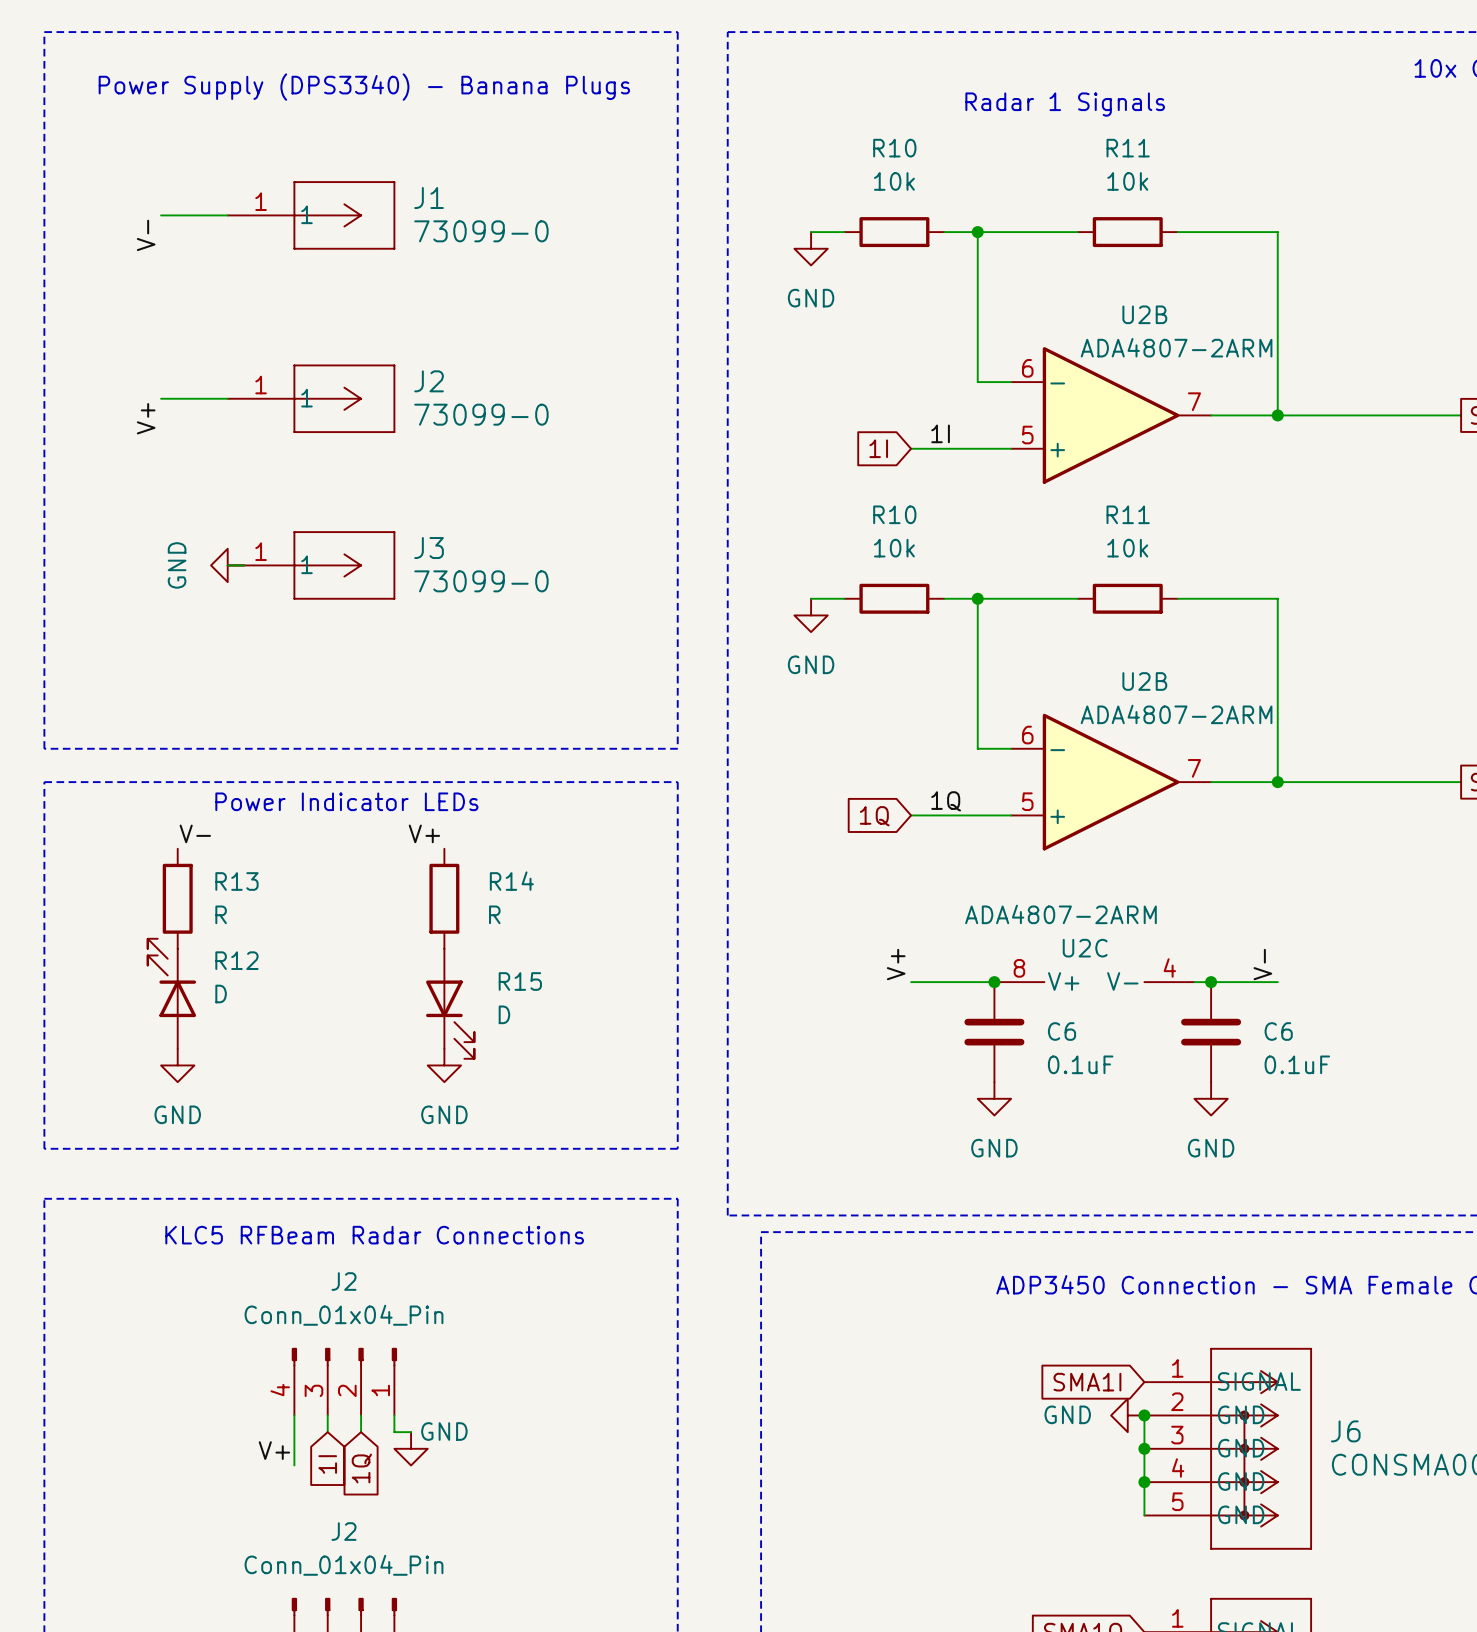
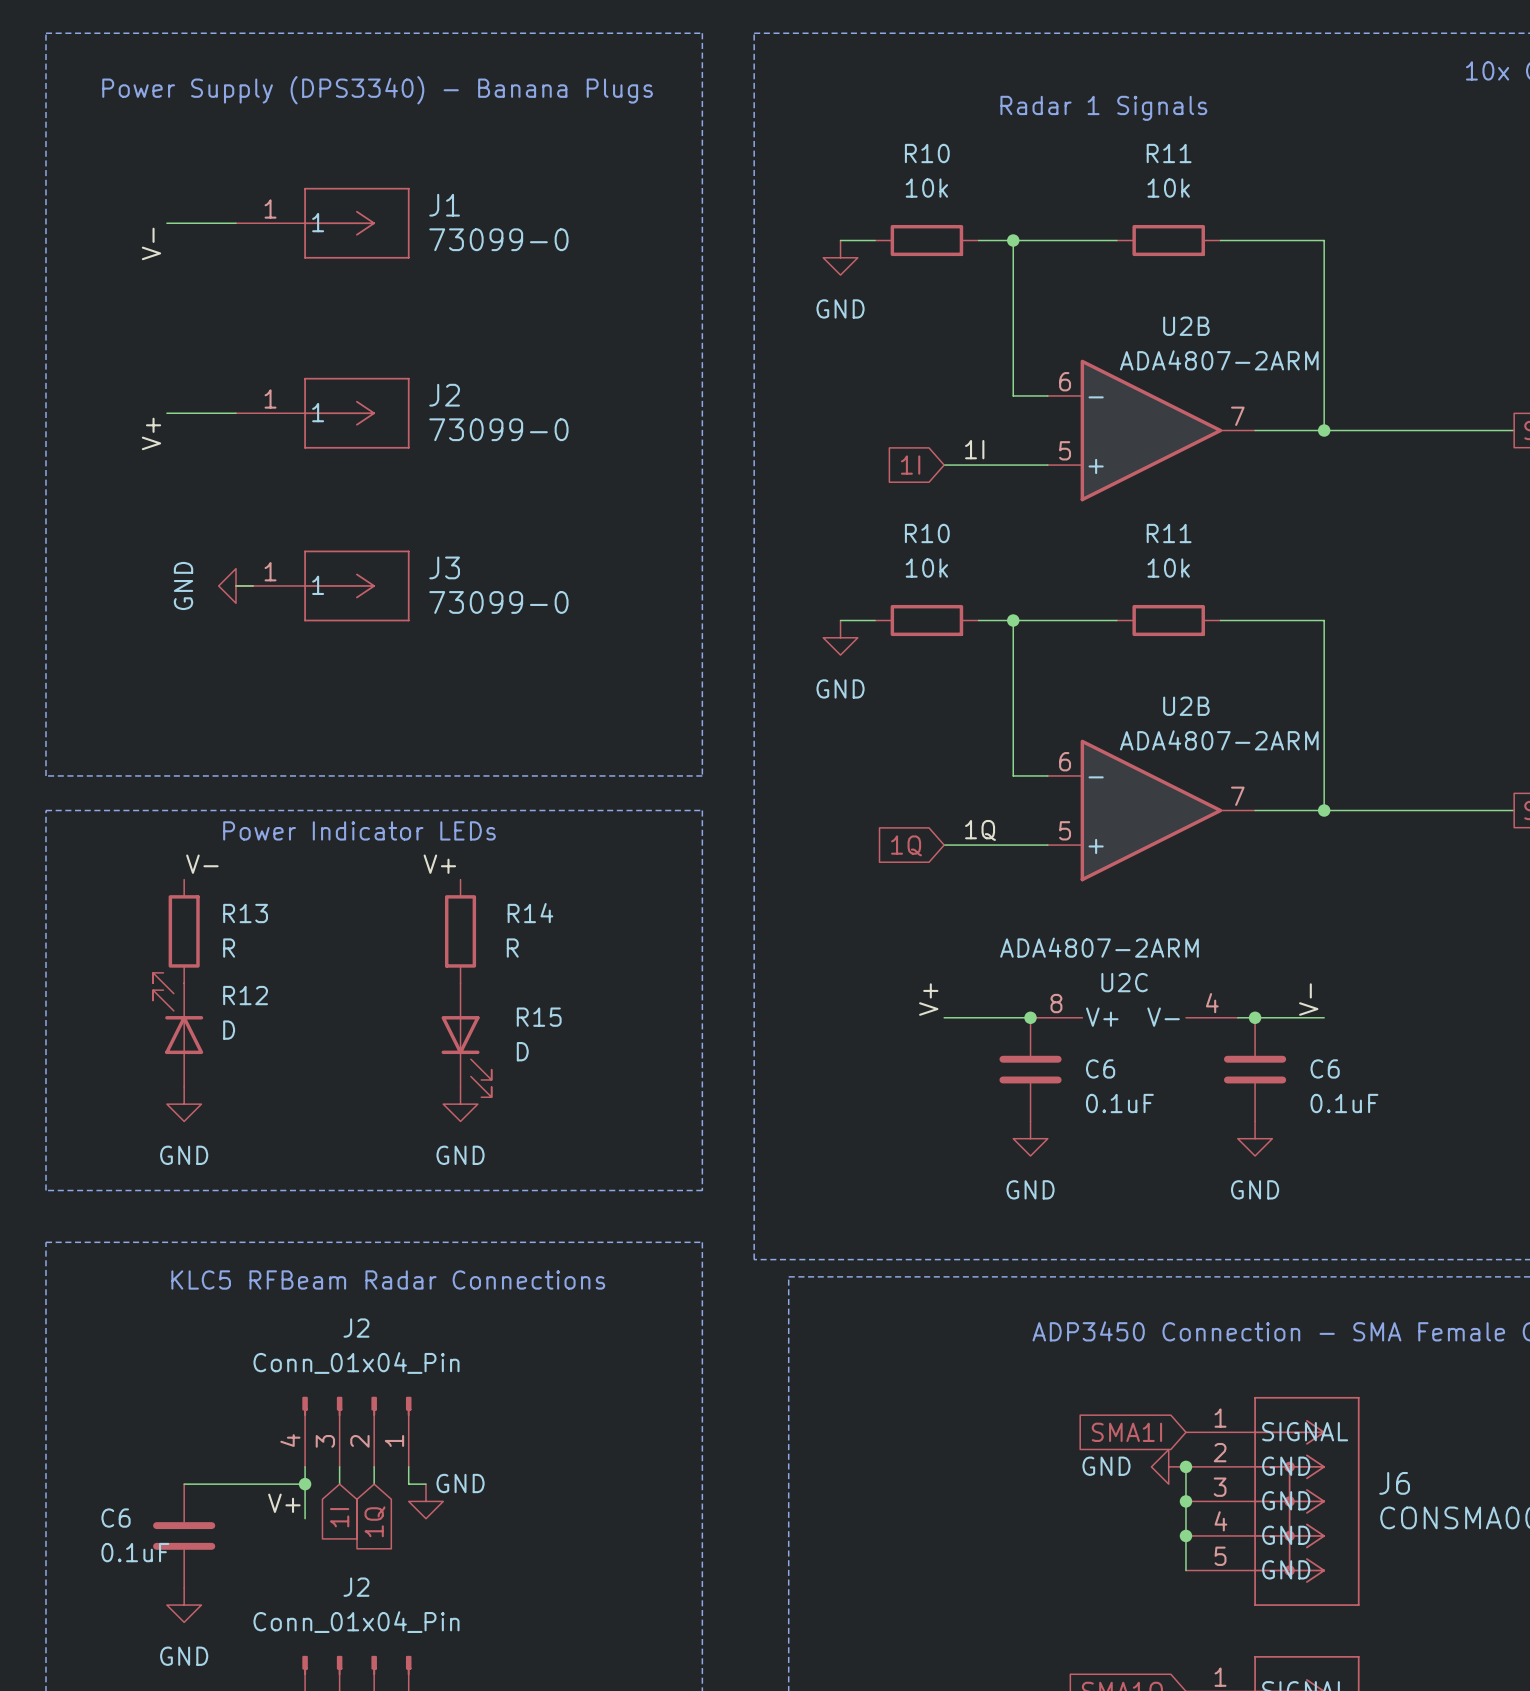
wire: none -> (184, 1484) (305, 1484)
junction: none -> (305, 1484)
C6: none -> 0.1uF (184, 1535)
power symbol: none -> GND (184, 1605)

